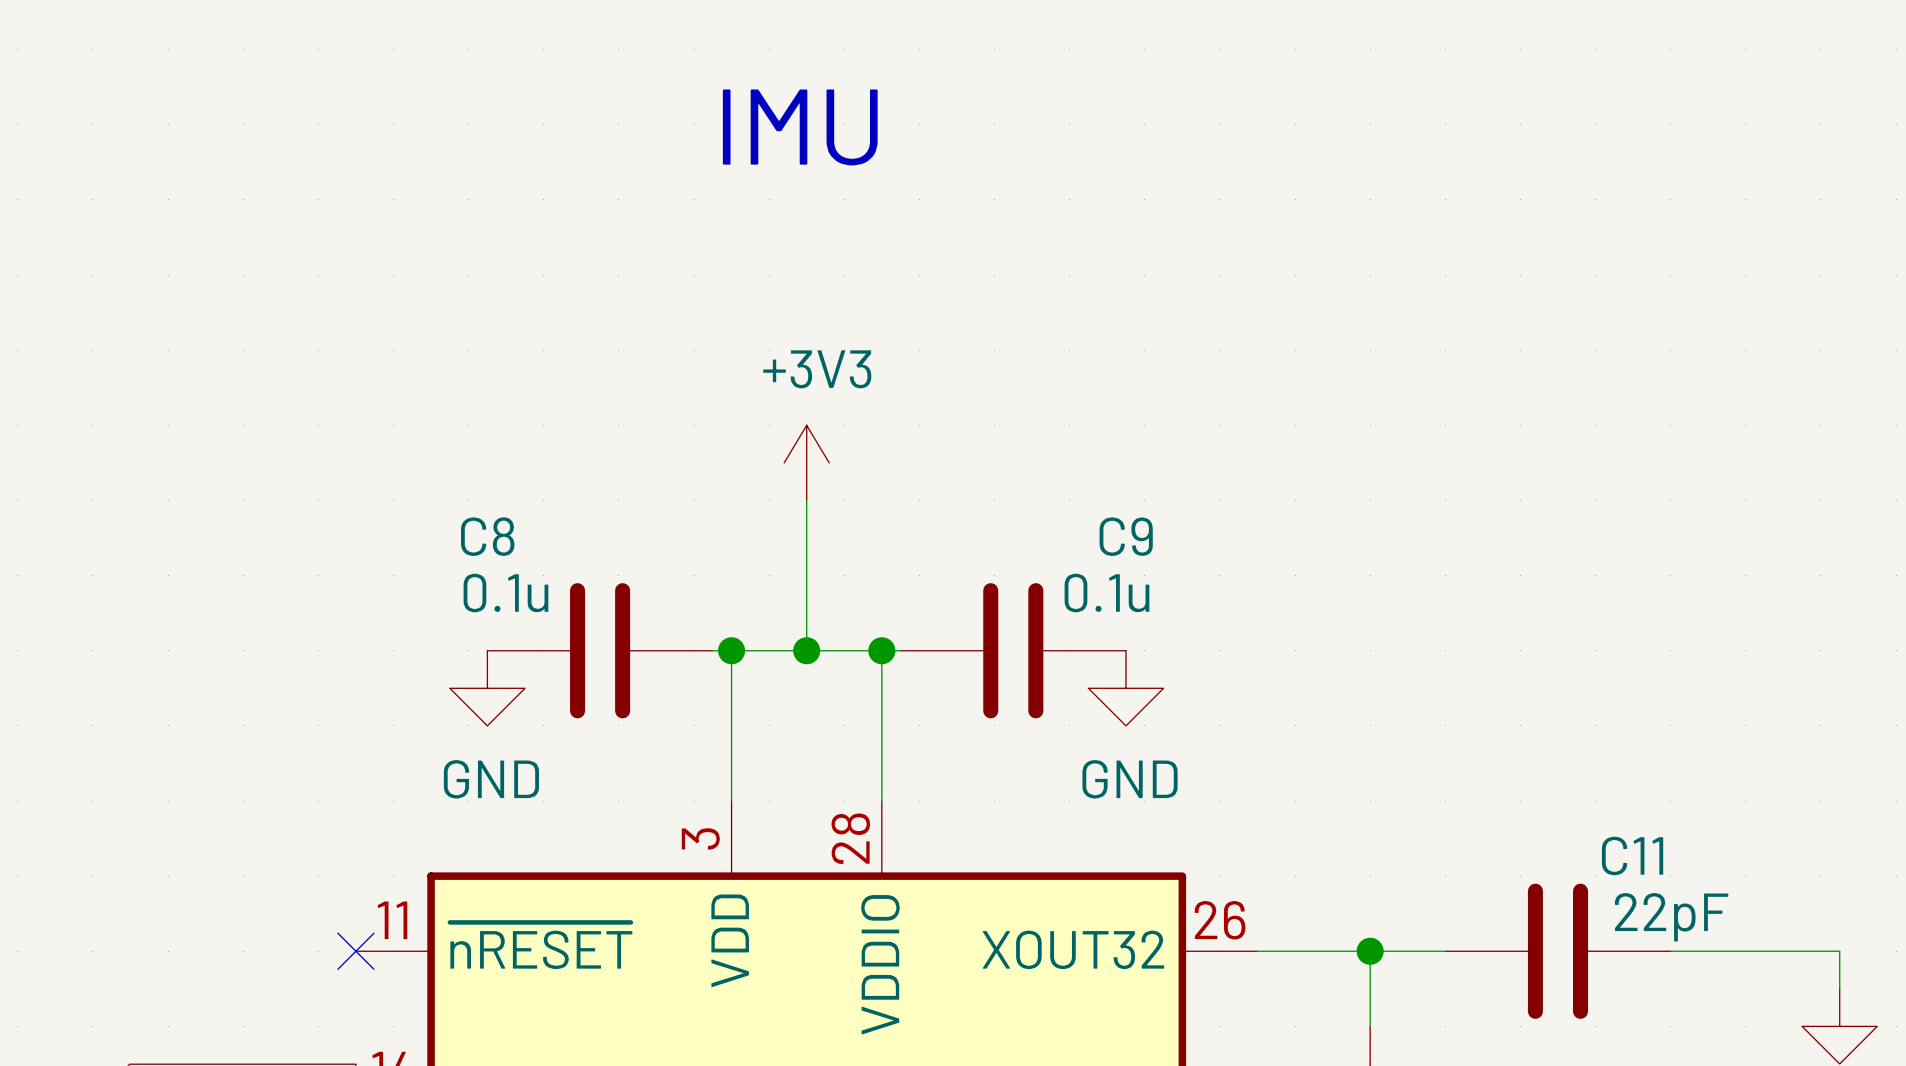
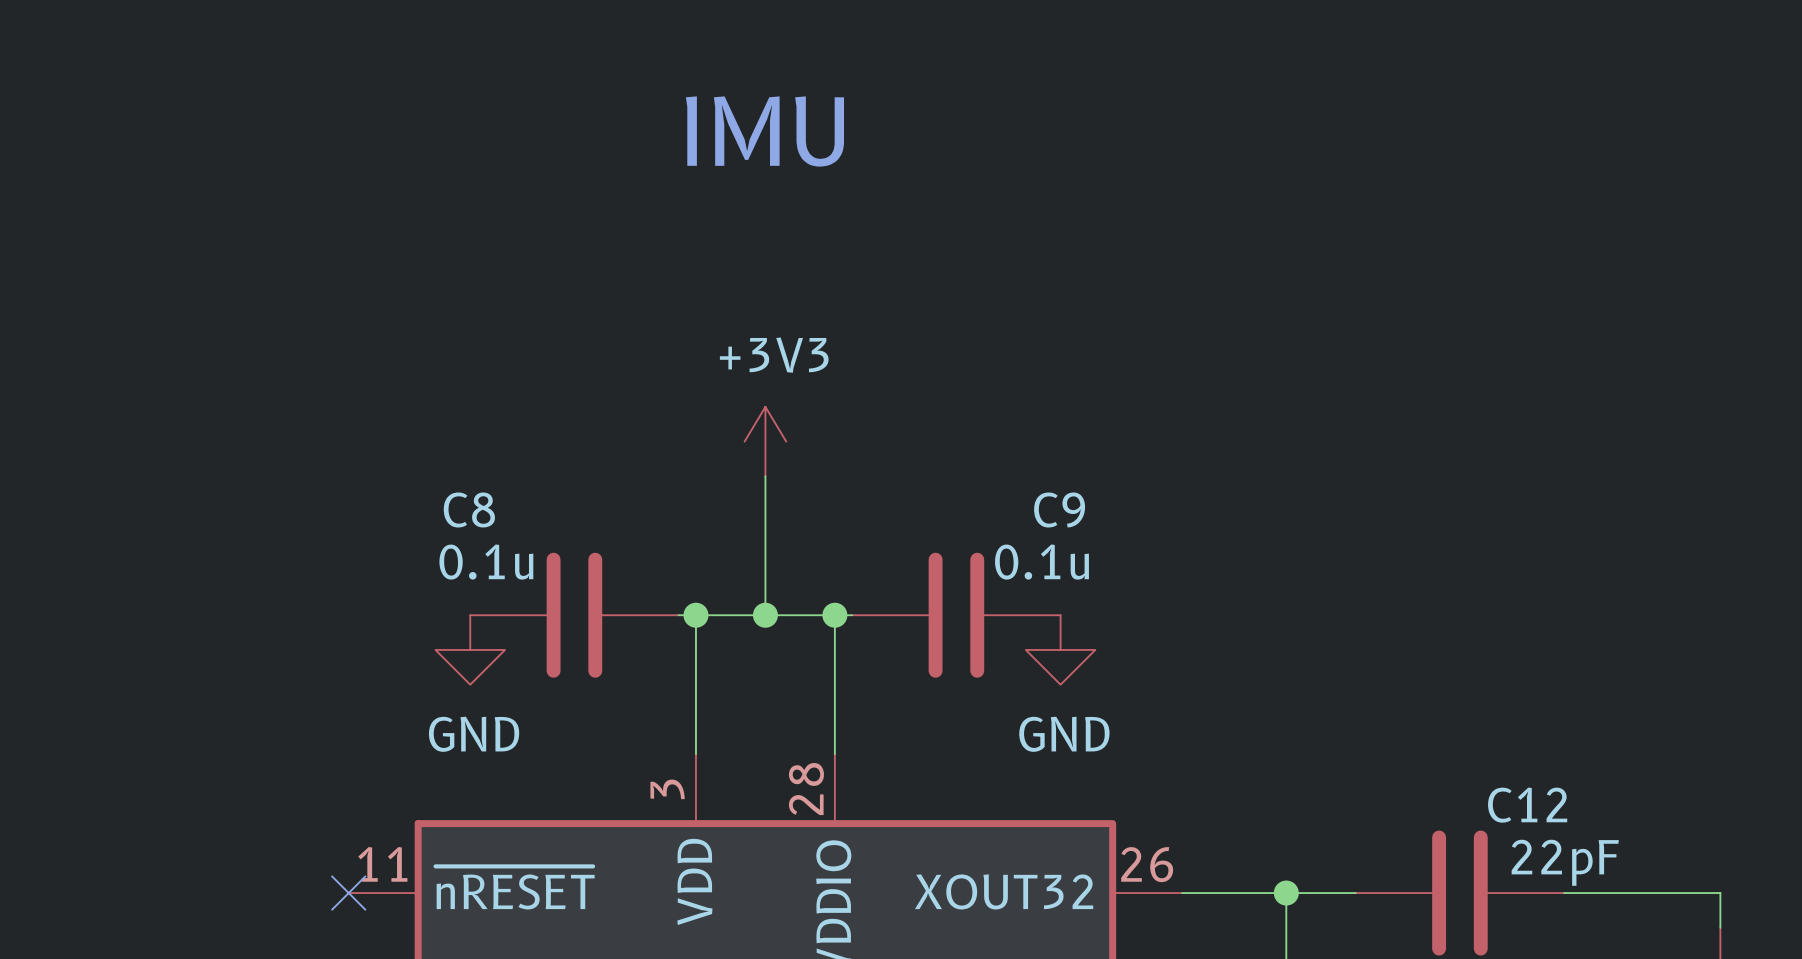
C11 name: C11 (1632, 855) -> C12 (1527, 805)

